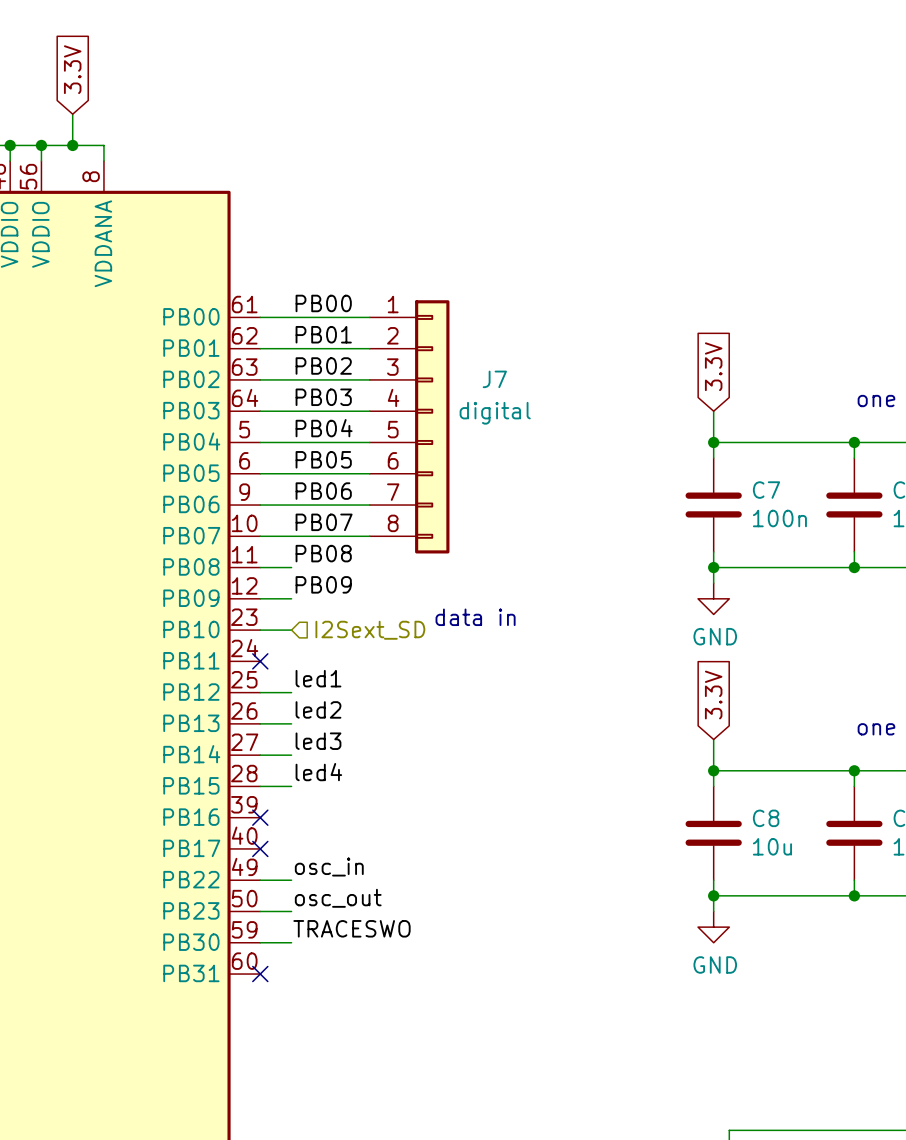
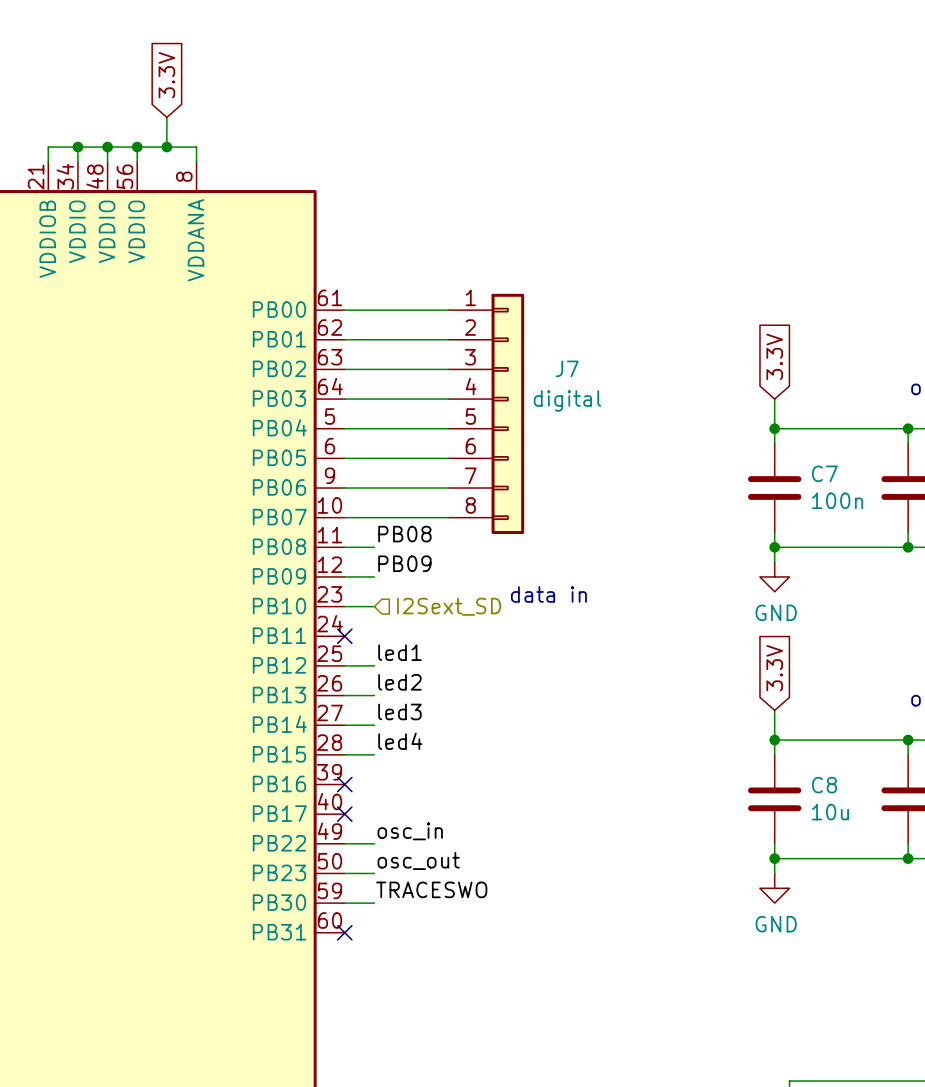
label: PB00 (323, 303) -> none
label: PB01 (323, 334) -> none
label: PB02 (323, 366) -> none
label: PB03 (323, 397) -> none
label: PB04 (324, 428) -> none
label: PB05 (323, 459) -> none
label: PB06 (323, 491) -> none
label: PB07 (324, 522) -> none

